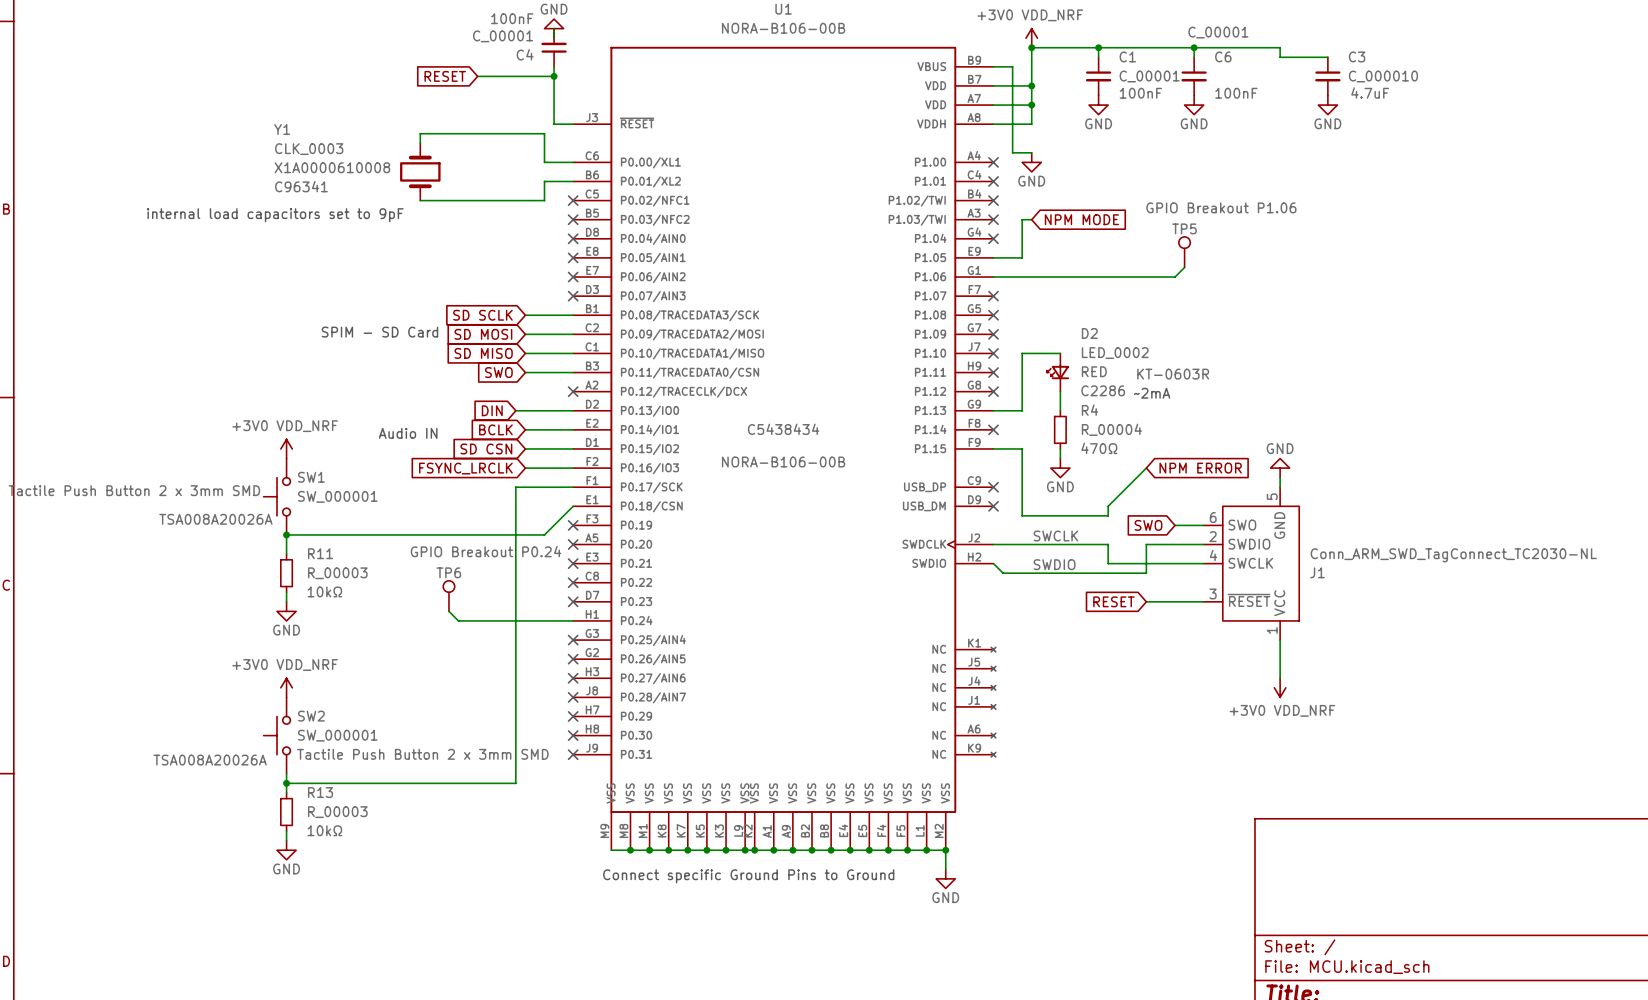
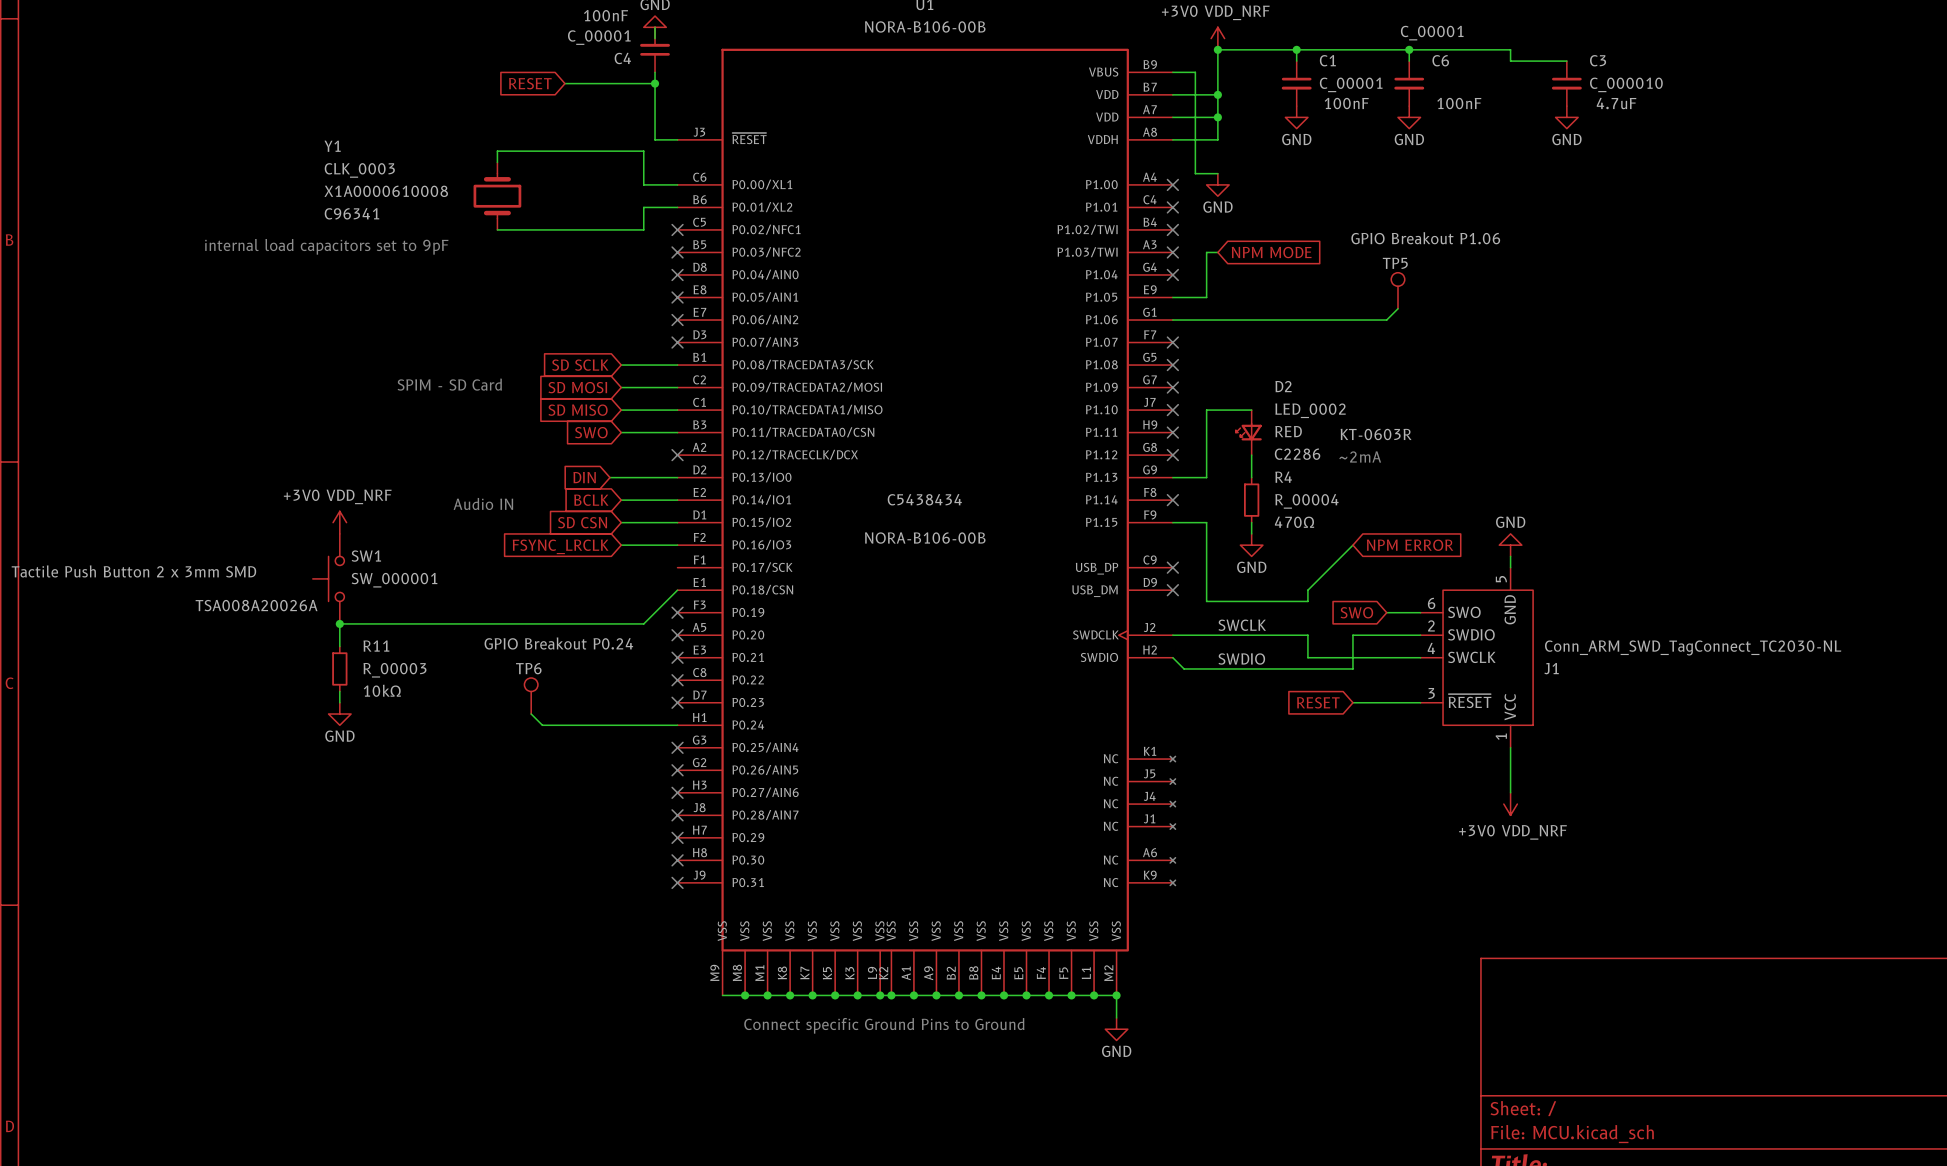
wire: (573, 487) (515, 487) (515, 783) (286, 783) -> none
power symbol: +3V0 VDD_NRF (286, 687) -> none
SW2: SW_000001 (277, 735) -> none
wire: (286, 773) (286, 792) -> none
junction: (286, 783) -> none
R13: R_00003 (286, 812) -> none
wire: (286, 831) (286, 840) -> none
power symbol: GND (286, 850) -> none

